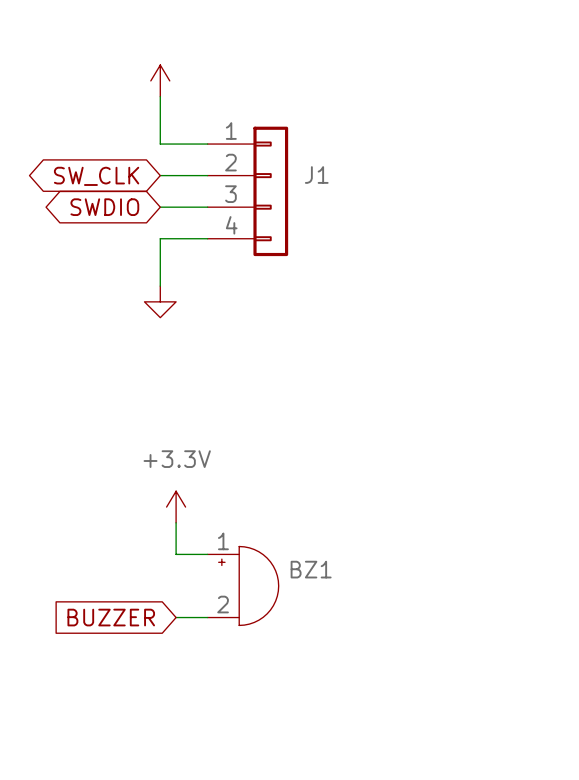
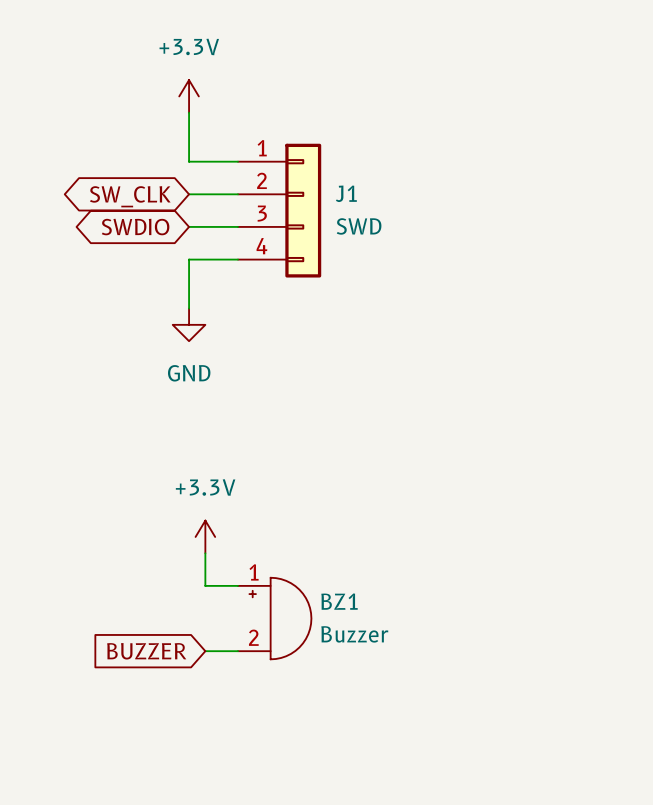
power symbol text: none -> +3.3V (189, 46)
J1 value: none -> SWD (359, 226)
power symbol text: none -> GND (189, 373)
BZ1 value: none -> Buzzer (354, 634)

